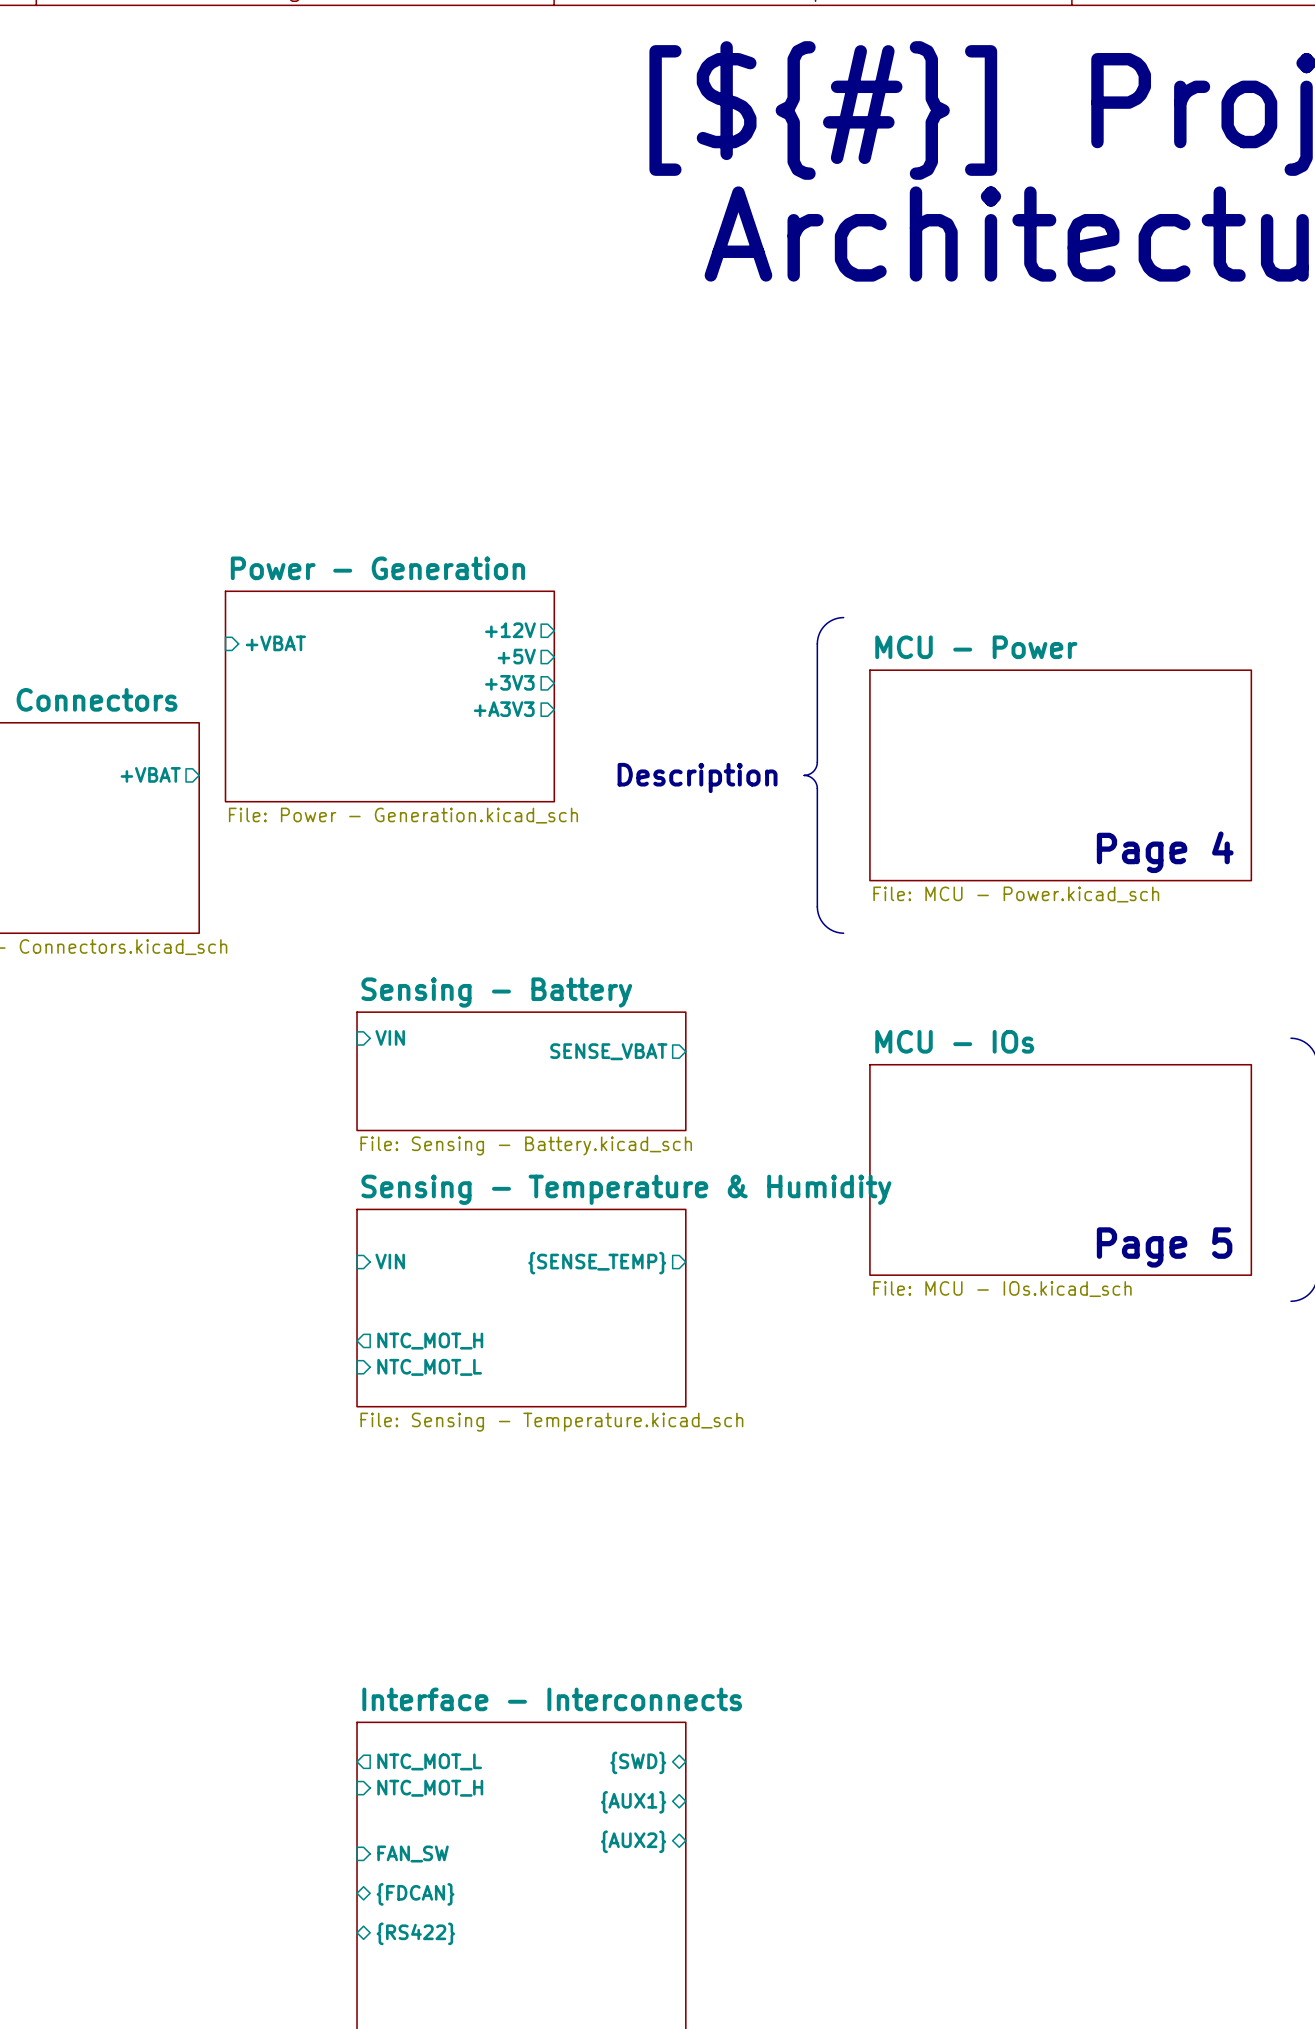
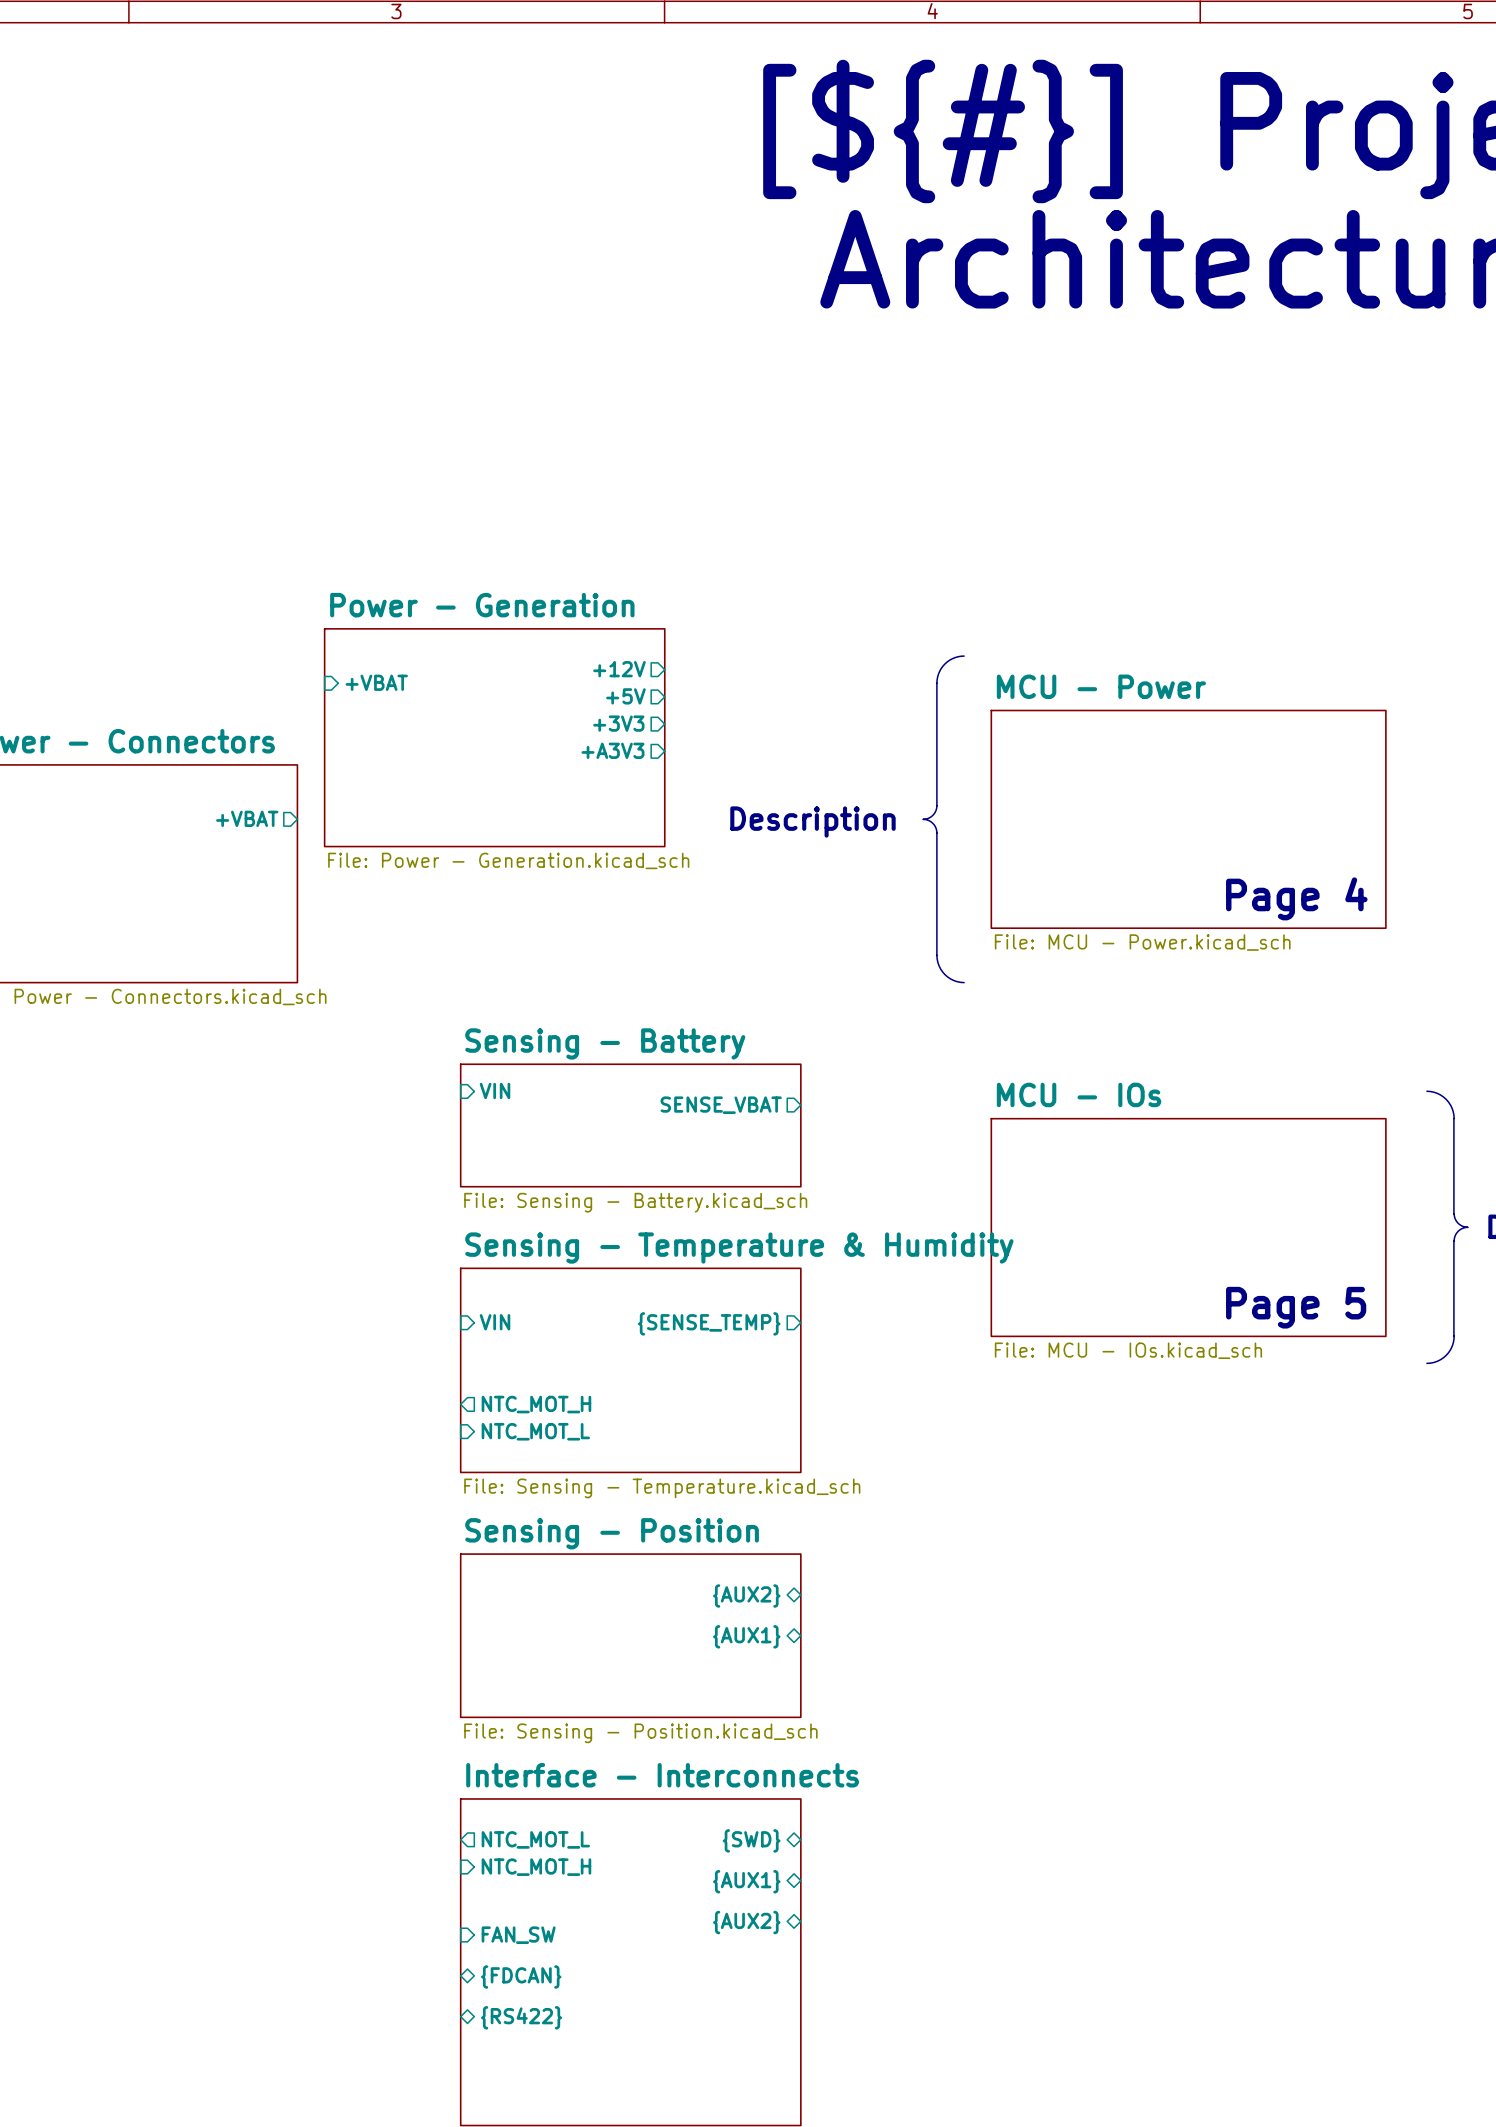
sheet pin: none -> {AUX2} (746, 1596)
sheet Sensing - Position: none -> File: Sensing - Position.kicad_sch (630, 1635)
sheet pin: none -> {AUX1} (746, 1636)

